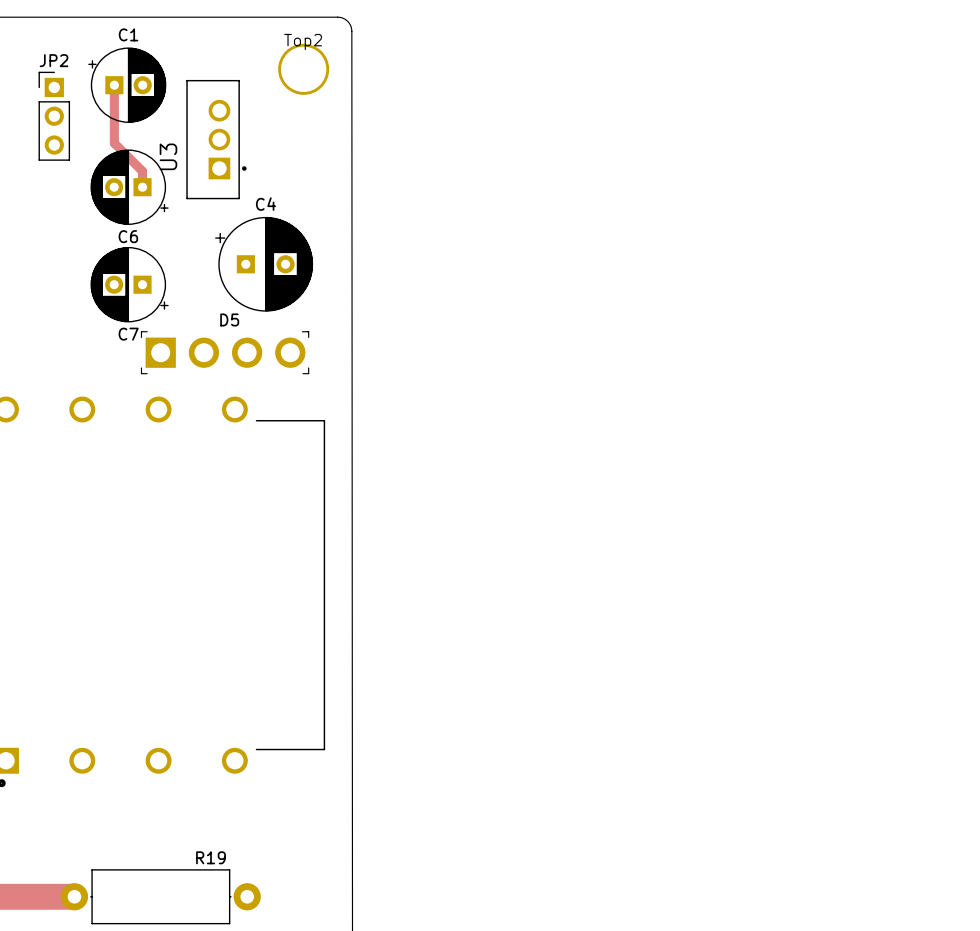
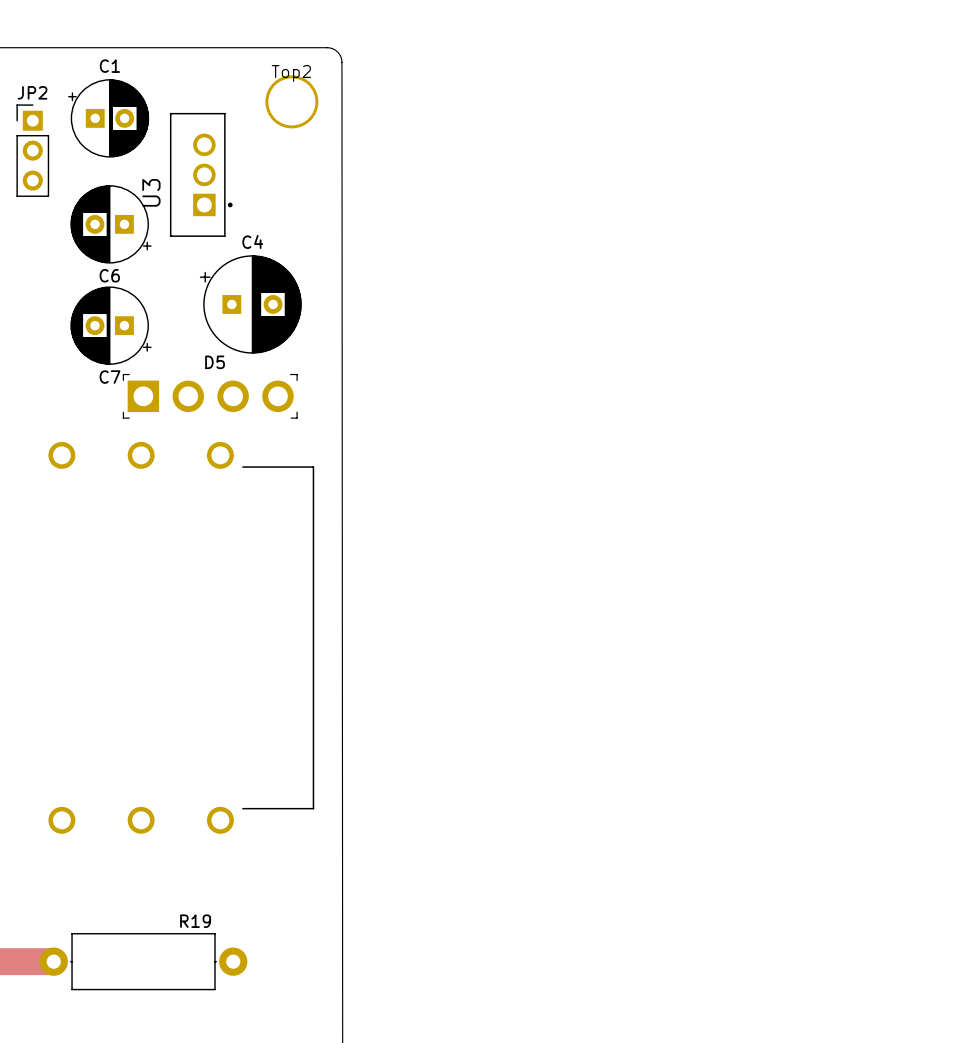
track: (114, 85) (114, 143) (142, 171) (142, 187) -> none

